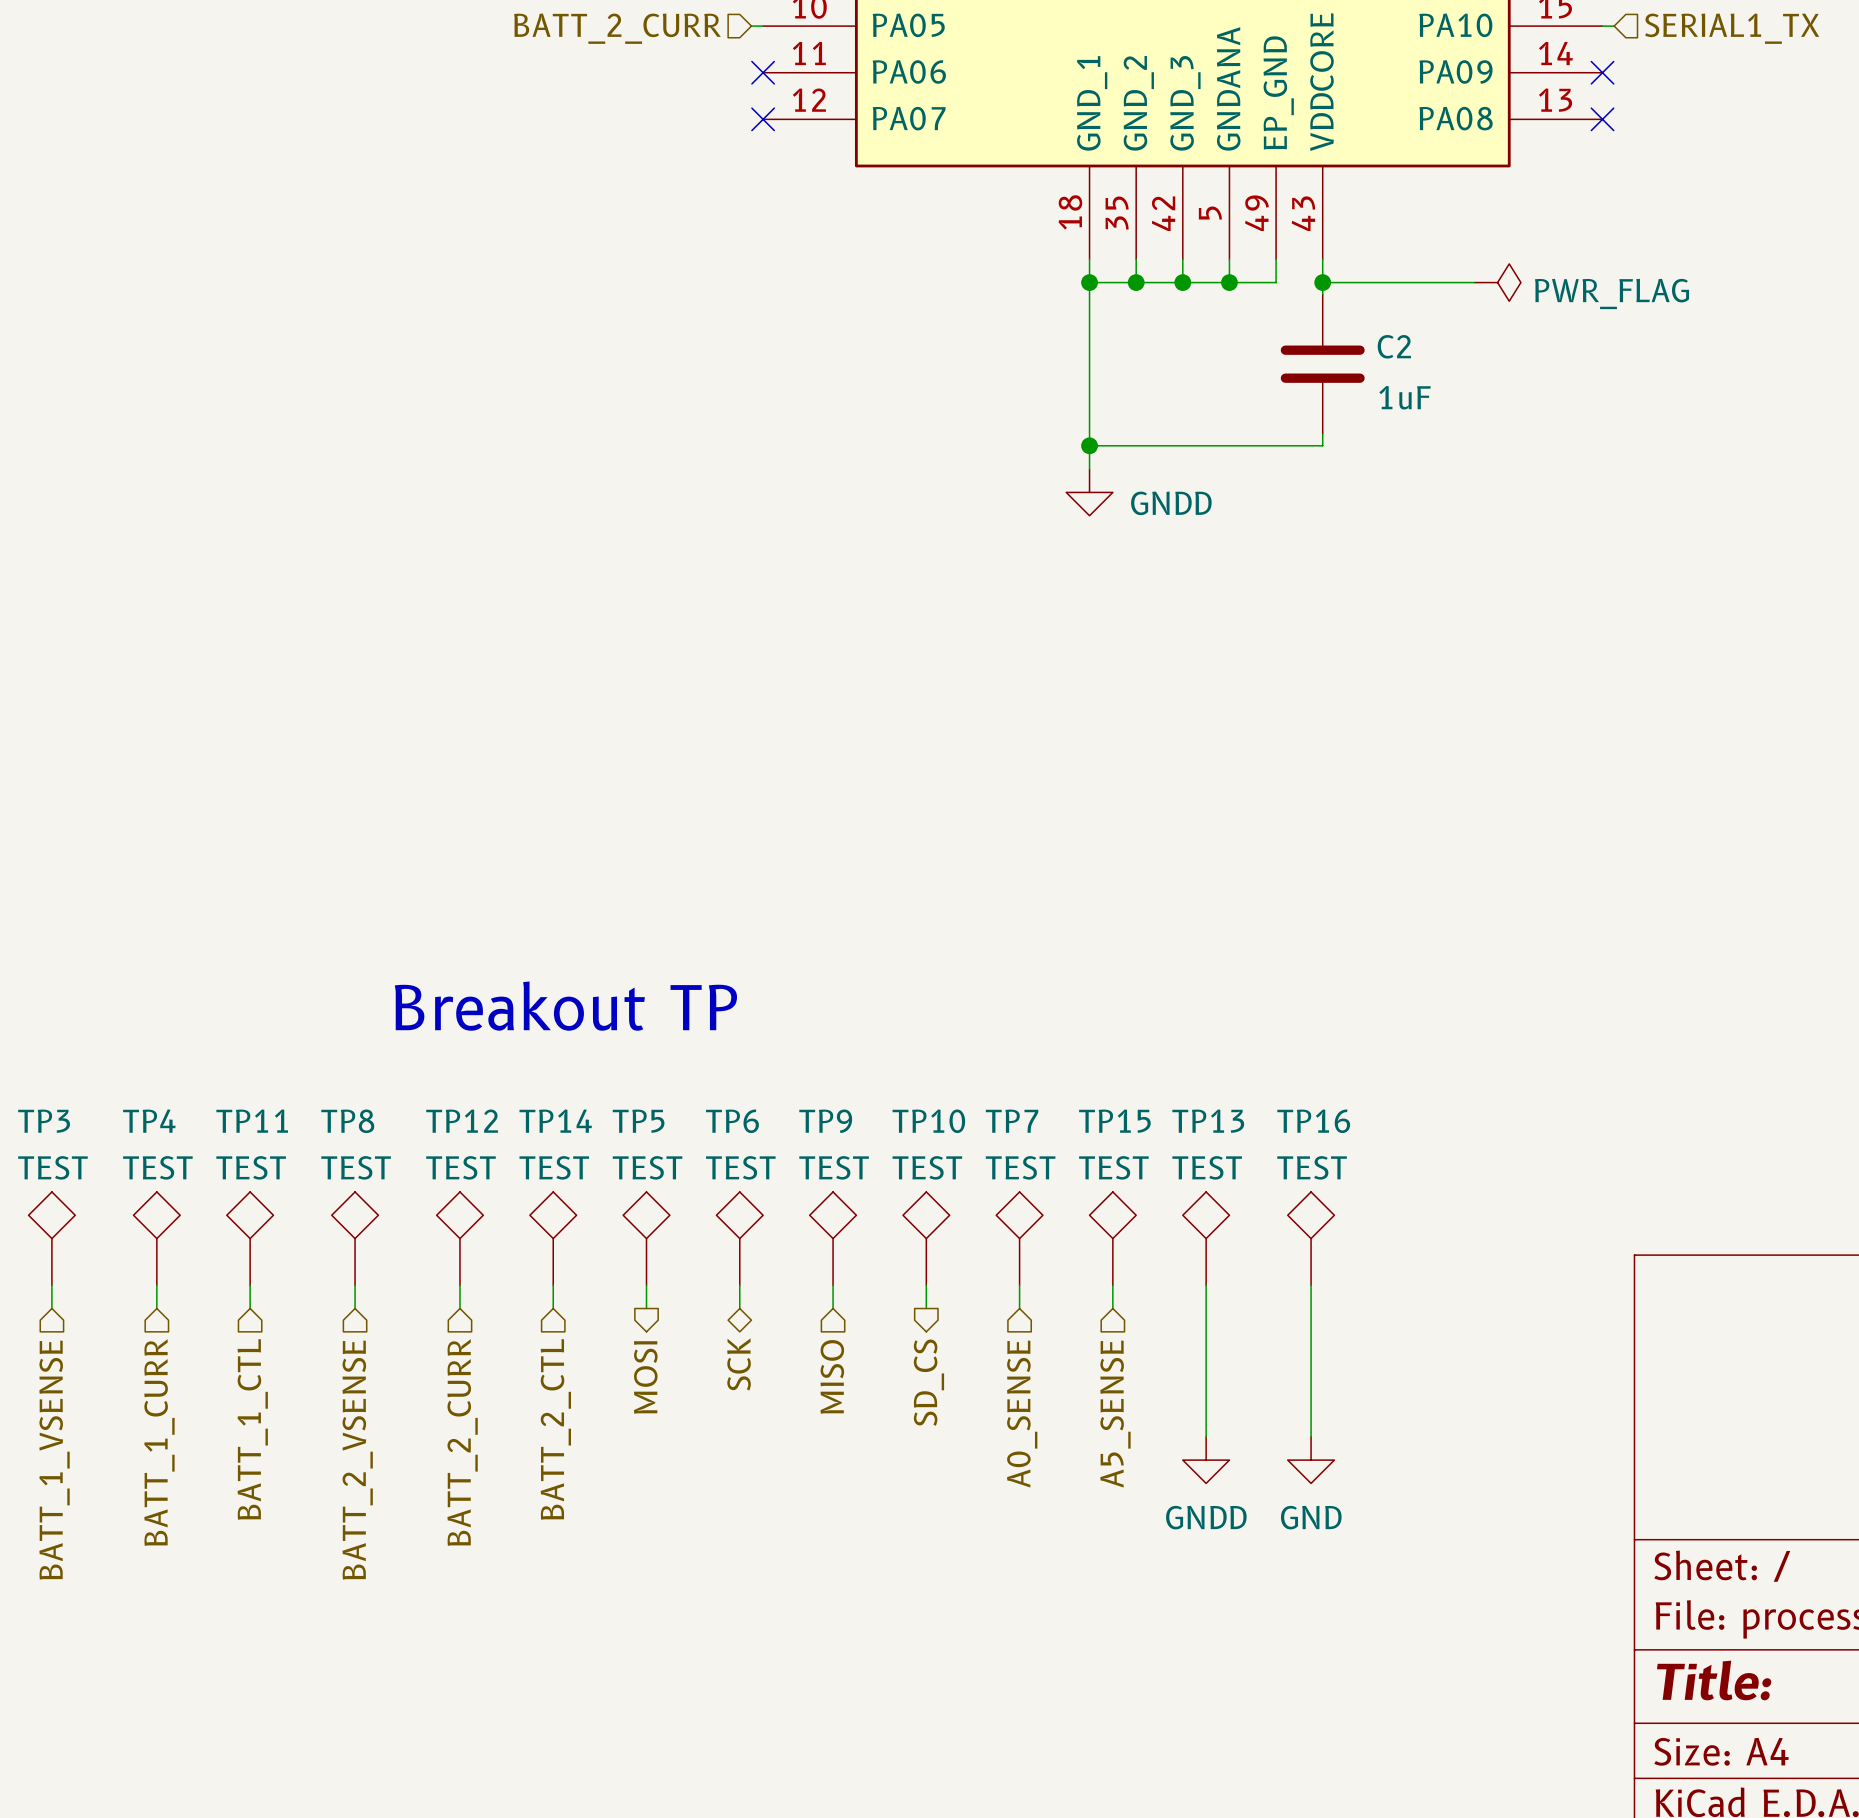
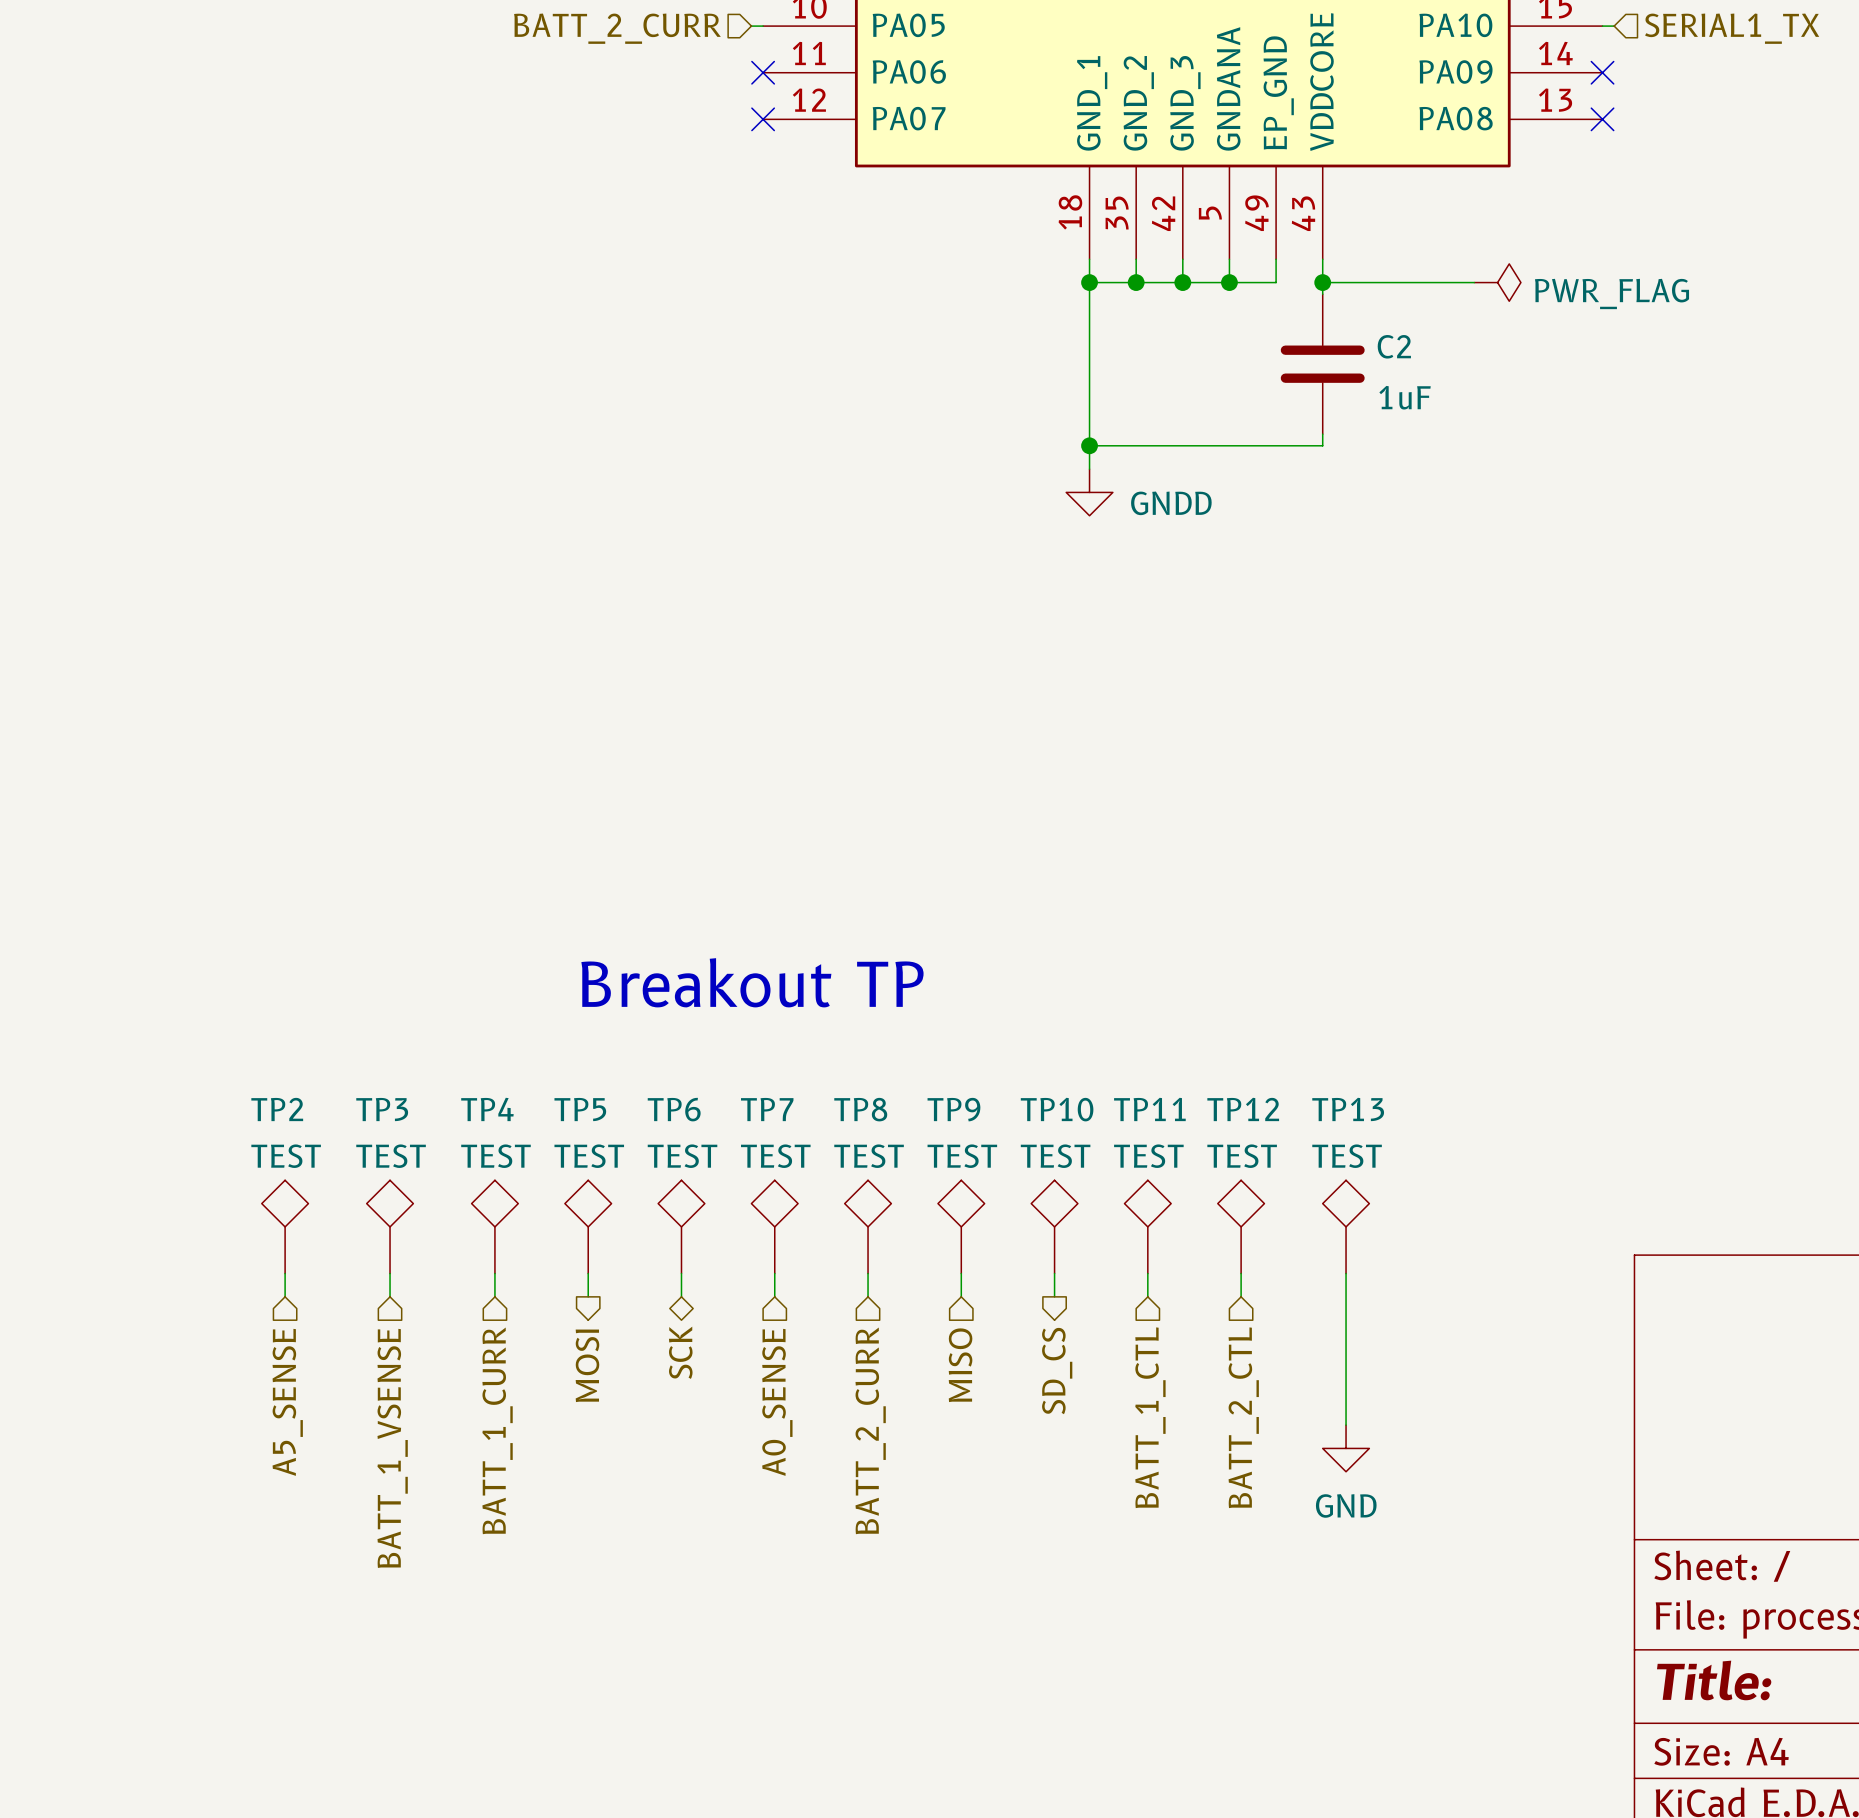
text position: Breakout TP (565, 1006) -> Breakout TP (752, 982)
TP2: none -> TEST (285, 1226)
TP3 position: (51, 1238) -> (390, 1226)
TP4 position: (156, 1238) -> (494, 1226)
TP11 position: (250, 1238) -> (1147, 1226)
TP8 position: (355, 1238) -> (868, 1226)
TP12 position: (459, 1238) -> (1241, 1226)
TP14: TEST (553, 1238) -> none
TP5 position: (646, 1238) -> (588, 1226)
TP6 position: (739, 1238) -> (681, 1226)
TP9 position: (833, 1238) -> (961, 1226)
TP10 position: (926, 1238) -> (1054, 1226)
TP7 position: (1019, 1238) -> (774, 1226)
TP15: TEST (1112, 1238) -> none
TP13 position: (1206, 1238) -> (1346, 1226)
TP16: TEST (1311, 1238) -> none
wire: none -> (1241, 1273) (1241, 1296)
wire: (51, 1285) (51, 1308) -> none
wire: (156, 1285) (156, 1308) -> none
wire: (250, 1285) (250, 1308) -> (285, 1273) (285, 1296)
wire: (355, 1285) (355, 1308) -> (390, 1273) (390, 1296)
wire: (459, 1285) (459, 1308) -> (494, 1273) (494, 1296)
wire: (553, 1285) (553, 1308) -> (588, 1273) (588, 1296)
wire: (646, 1285) (646, 1308) -> (681, 1273) (681, 1296)
wire: (739, 1285) (739, 1308) -> (774, 1273) (774, 1296)
wire: (833, 1285) (833, 1308) -> (868, 1273) (868, 1296)
wire: (926, 1285) (926, 1308) -> (961, 1273) (961, 1296)
wire: (1019, 1285) (1019, 1308) -> (1054, 1273) (1054, 1296)
wire: (1112, 1285) (1112, 1308) -> (1147, 1273) (1147, 1296)
wire: (1206, 1285) (1206, 1436) -> none
wire: (1311, 1285) (1311, 1436) -> (1346, 1273) (1346, 1425)
hierarchical label position: SCK (739, 1364) -> SCK (680, 1352)
hierarchical label position: MISO (832, 1376) -> MISO (960, 1365)
hierarchical label position: MOSI (645, 1377) -> MOSI (587, 1365)
hierarchical label position: SD_CS (928, 1382) -> SD_CS (1057, 1371)
hierarchical label: none -> A5_SENSE (287, 1402)
hierarchical label position: A0_SENSE (1022, 1414) -> A0_SENSE (777, 1402)
hierarchical label: A5_SENSE (1115, 1414) -> none
hierarchical label: none -> BATT_1_CTL (1150, 1417)
hierarchical label: none -> BATT_2_CTL (1243, 1417)
hierarchical label: BATT_1_CTL (252, 1429) -> none
hierarchical label: BATT_2_CTL (555, 1429) -> none
hierarchical label position: BATT_1_CURR (159, 1442) -> BATT_1_CURR (497, 1430)
hierarchical label position: BATT_2_CURR (462, 1442) -> BATT_2_CURR (870, 1430)
hierarchical label position: BATT_1_VSENSE (54, 1460) -> BATT_1_VSENSE (392, 1448)
hierarchical label: BATT_2_VSENSE (357, 1460) -> none
power symbol: GNDD (1206, 1460) -> none
power symbol position: GND (1311, 1460) -> GND (1346, 1448)

